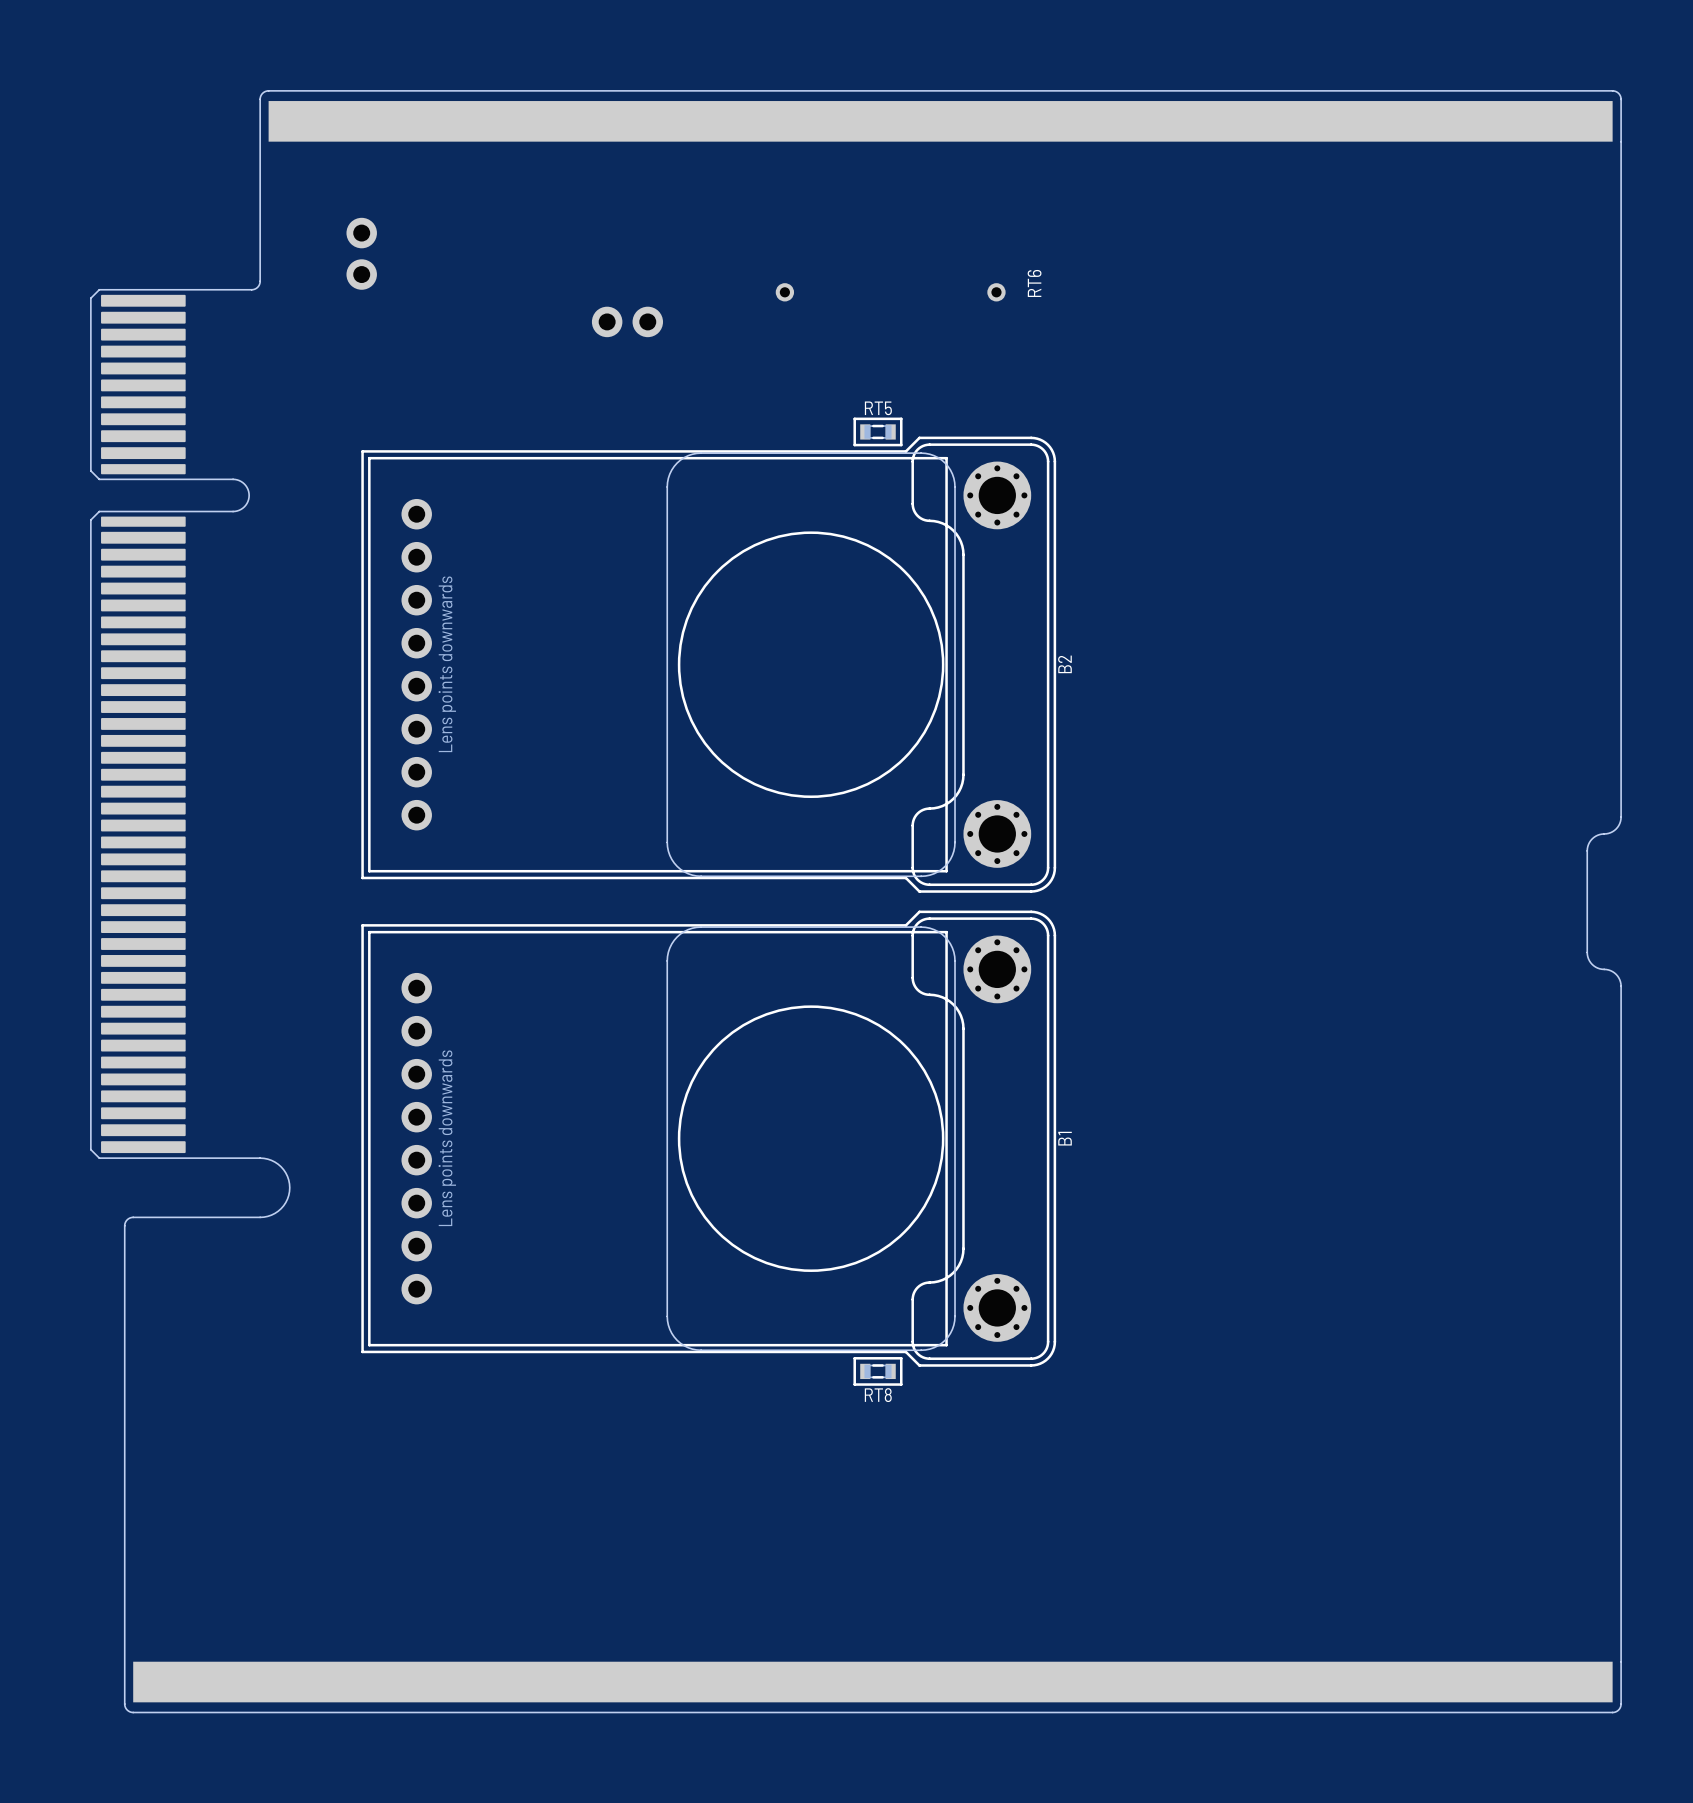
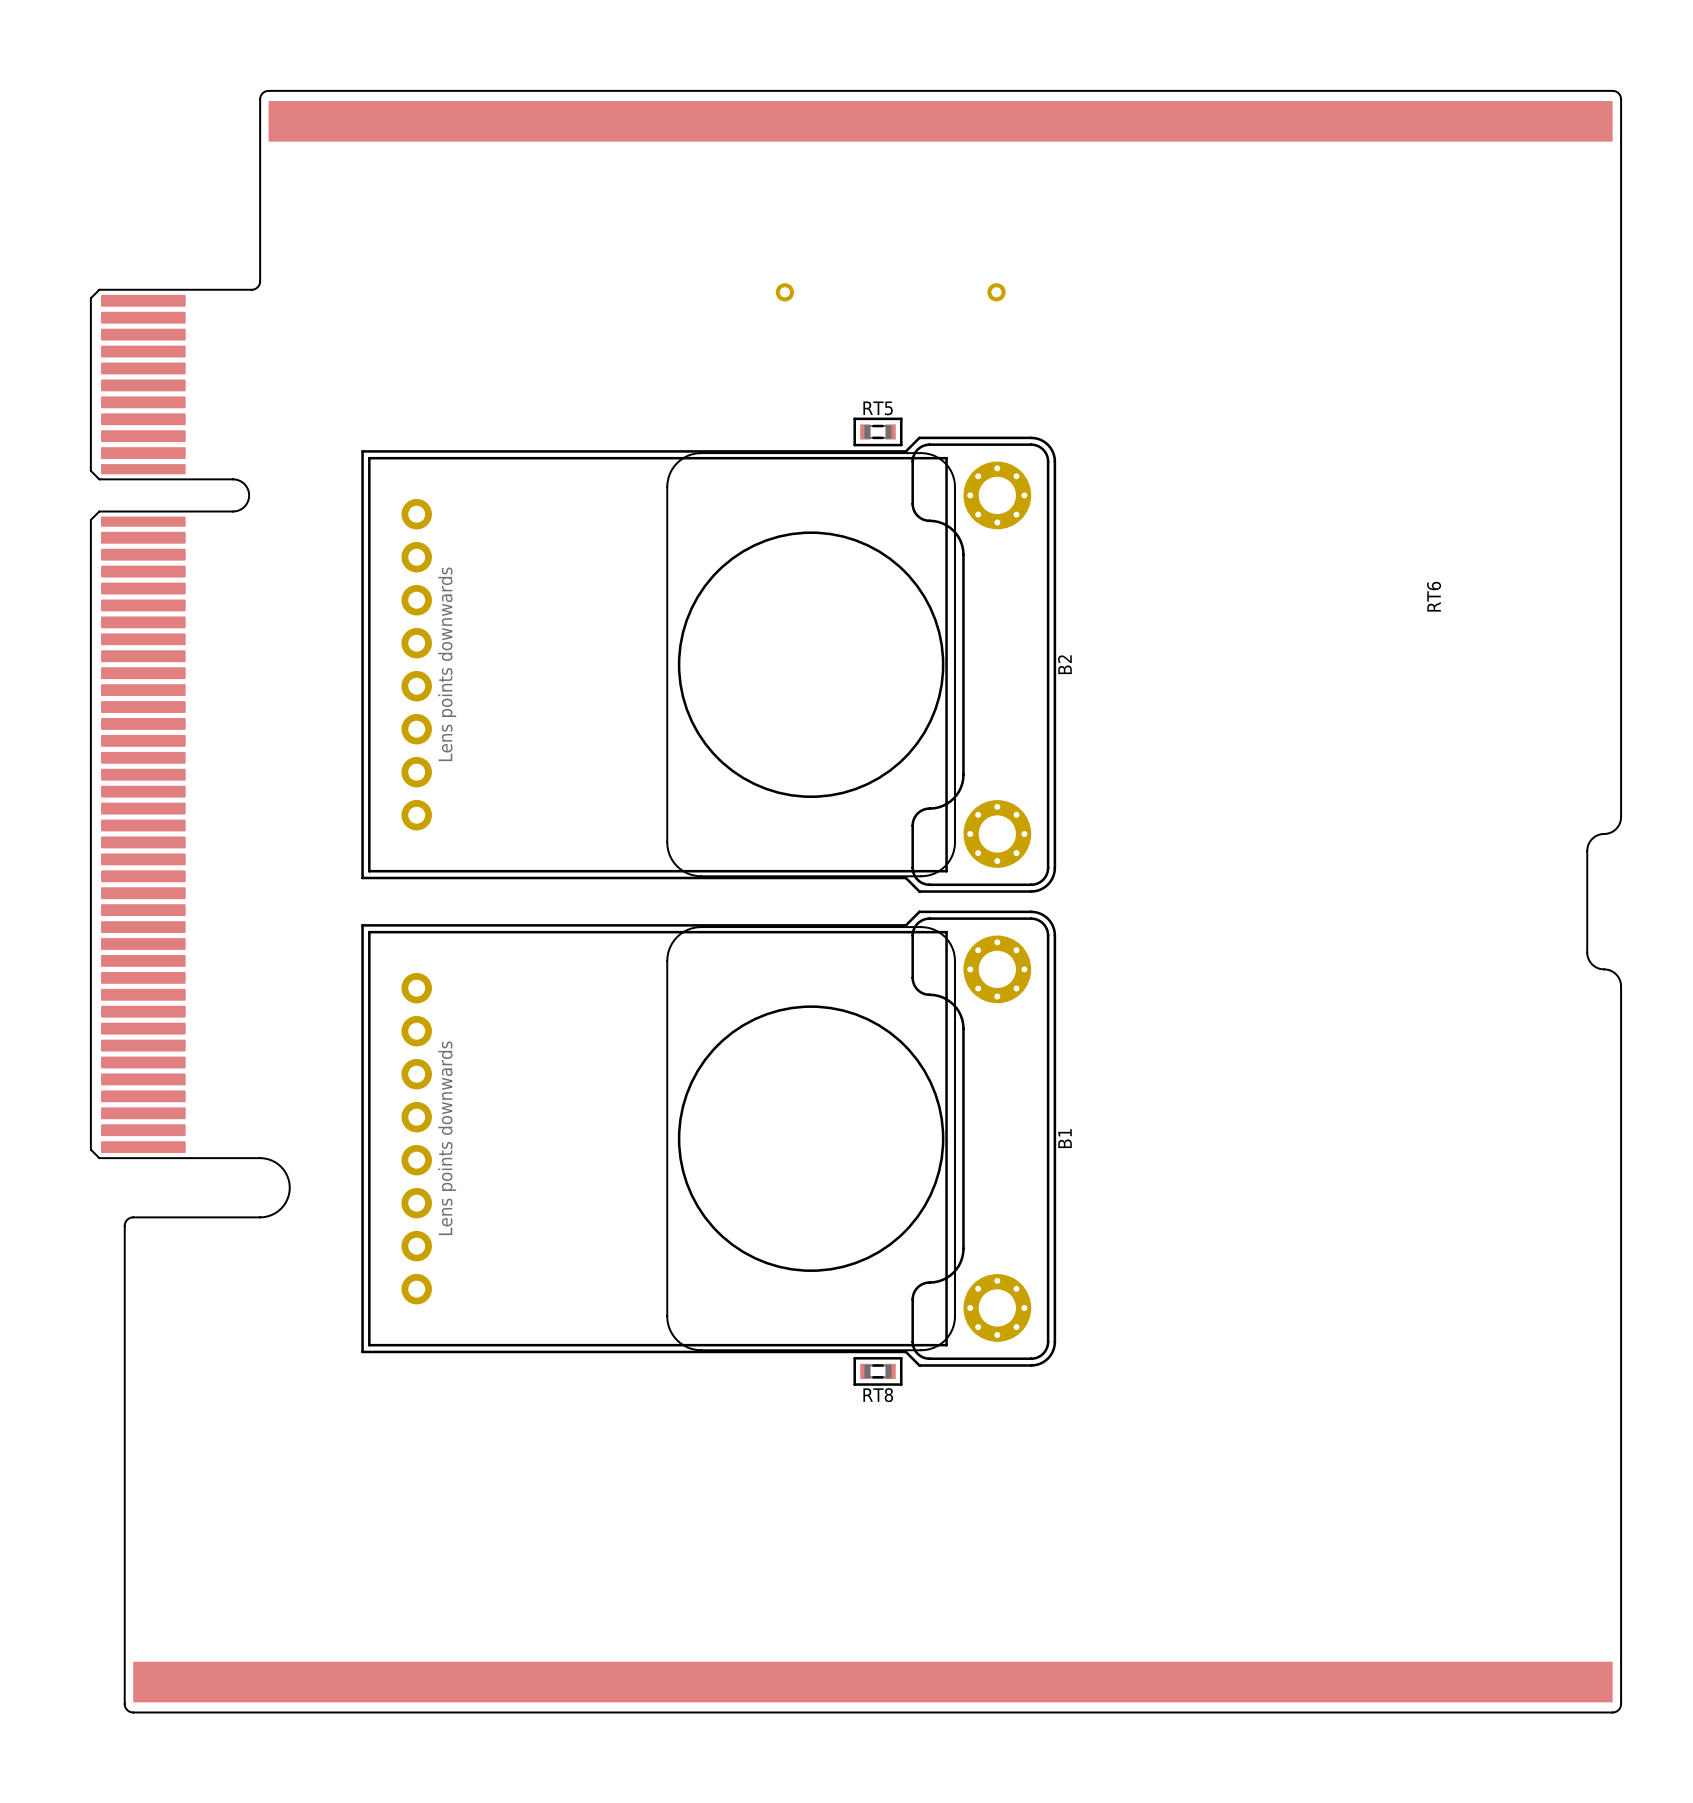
part: (361, 233) -> none
part: (361, 274) -> none
RT6 position: (1034, 283) -> (1434, 596)
part: (607, 321) -> none
part: (647, 321) -> none

